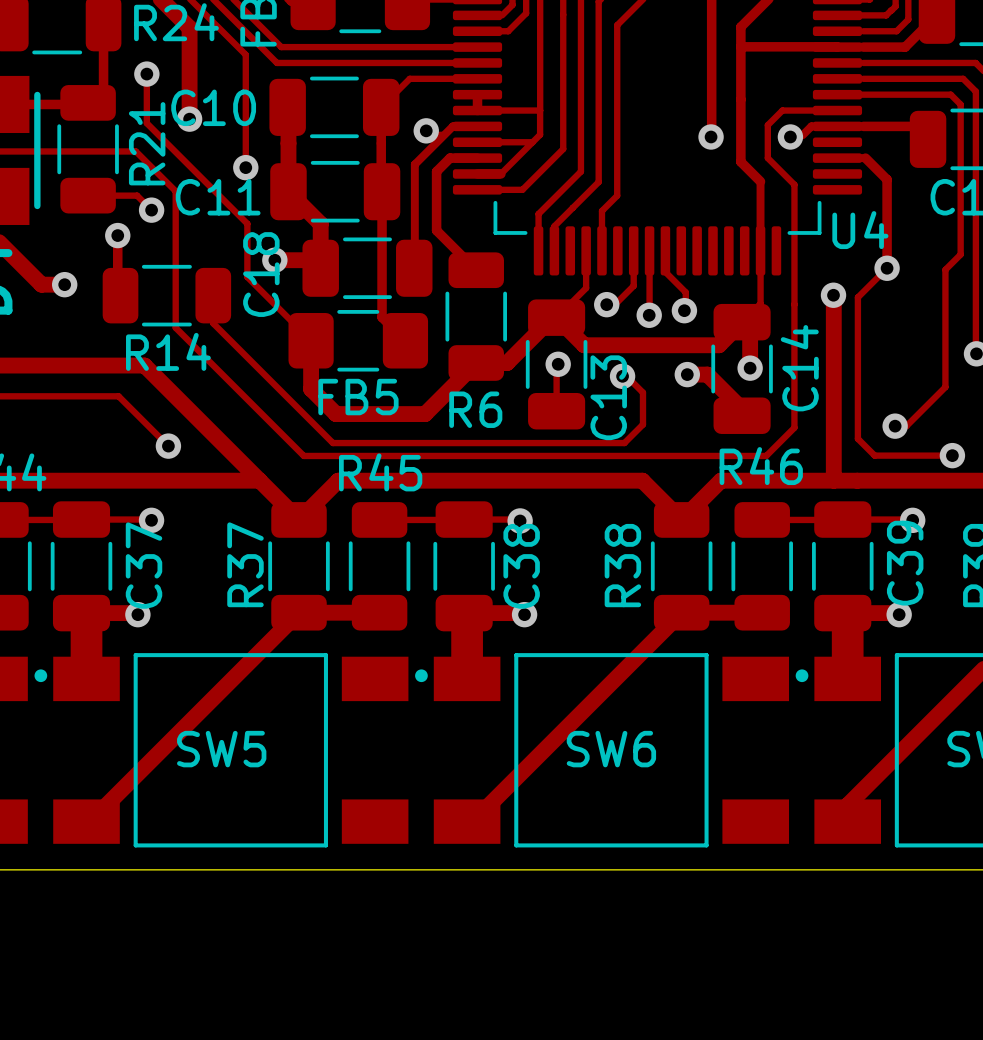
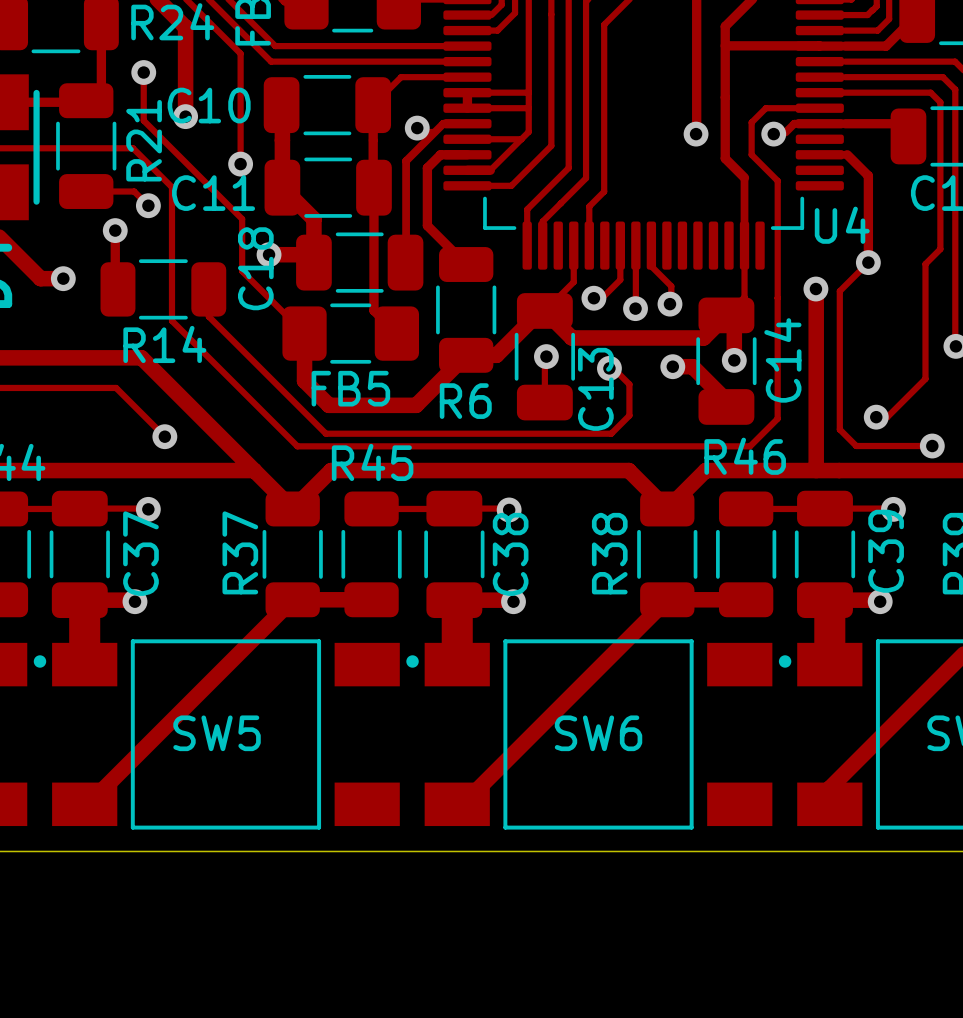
track: none -> (467, 92) (528, 92)

